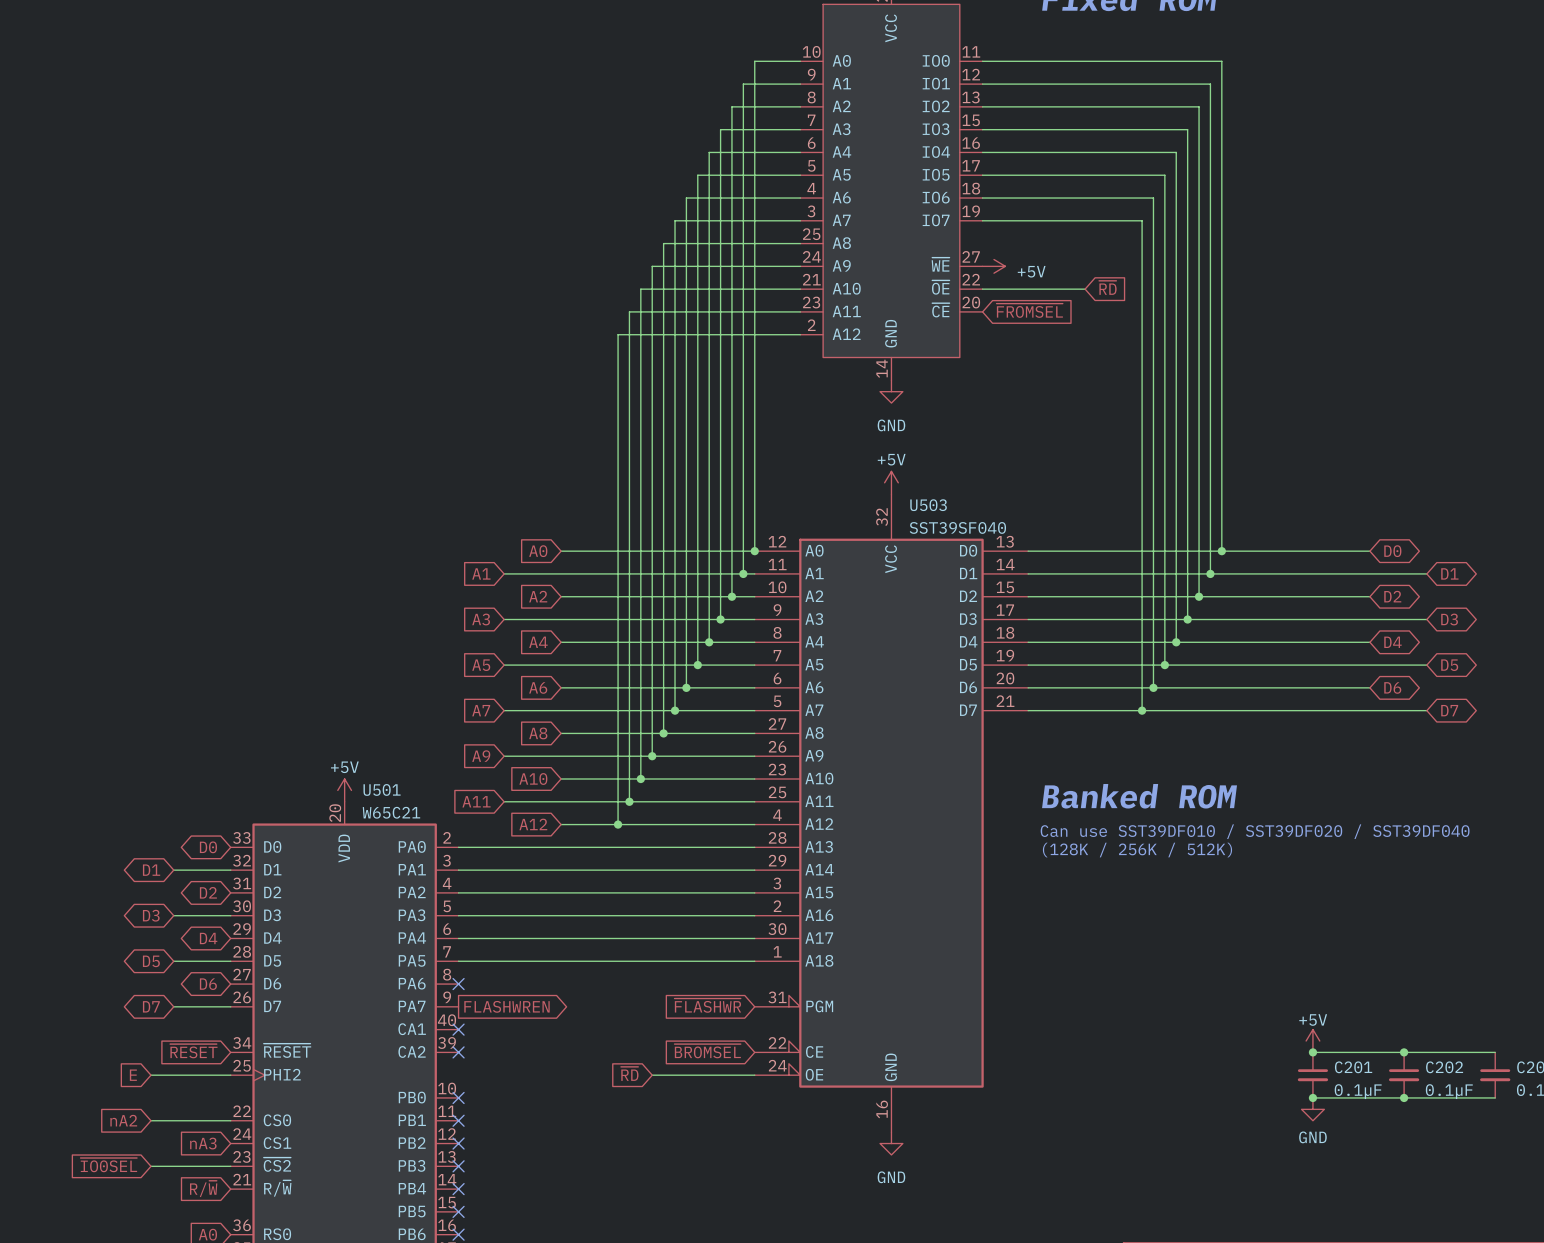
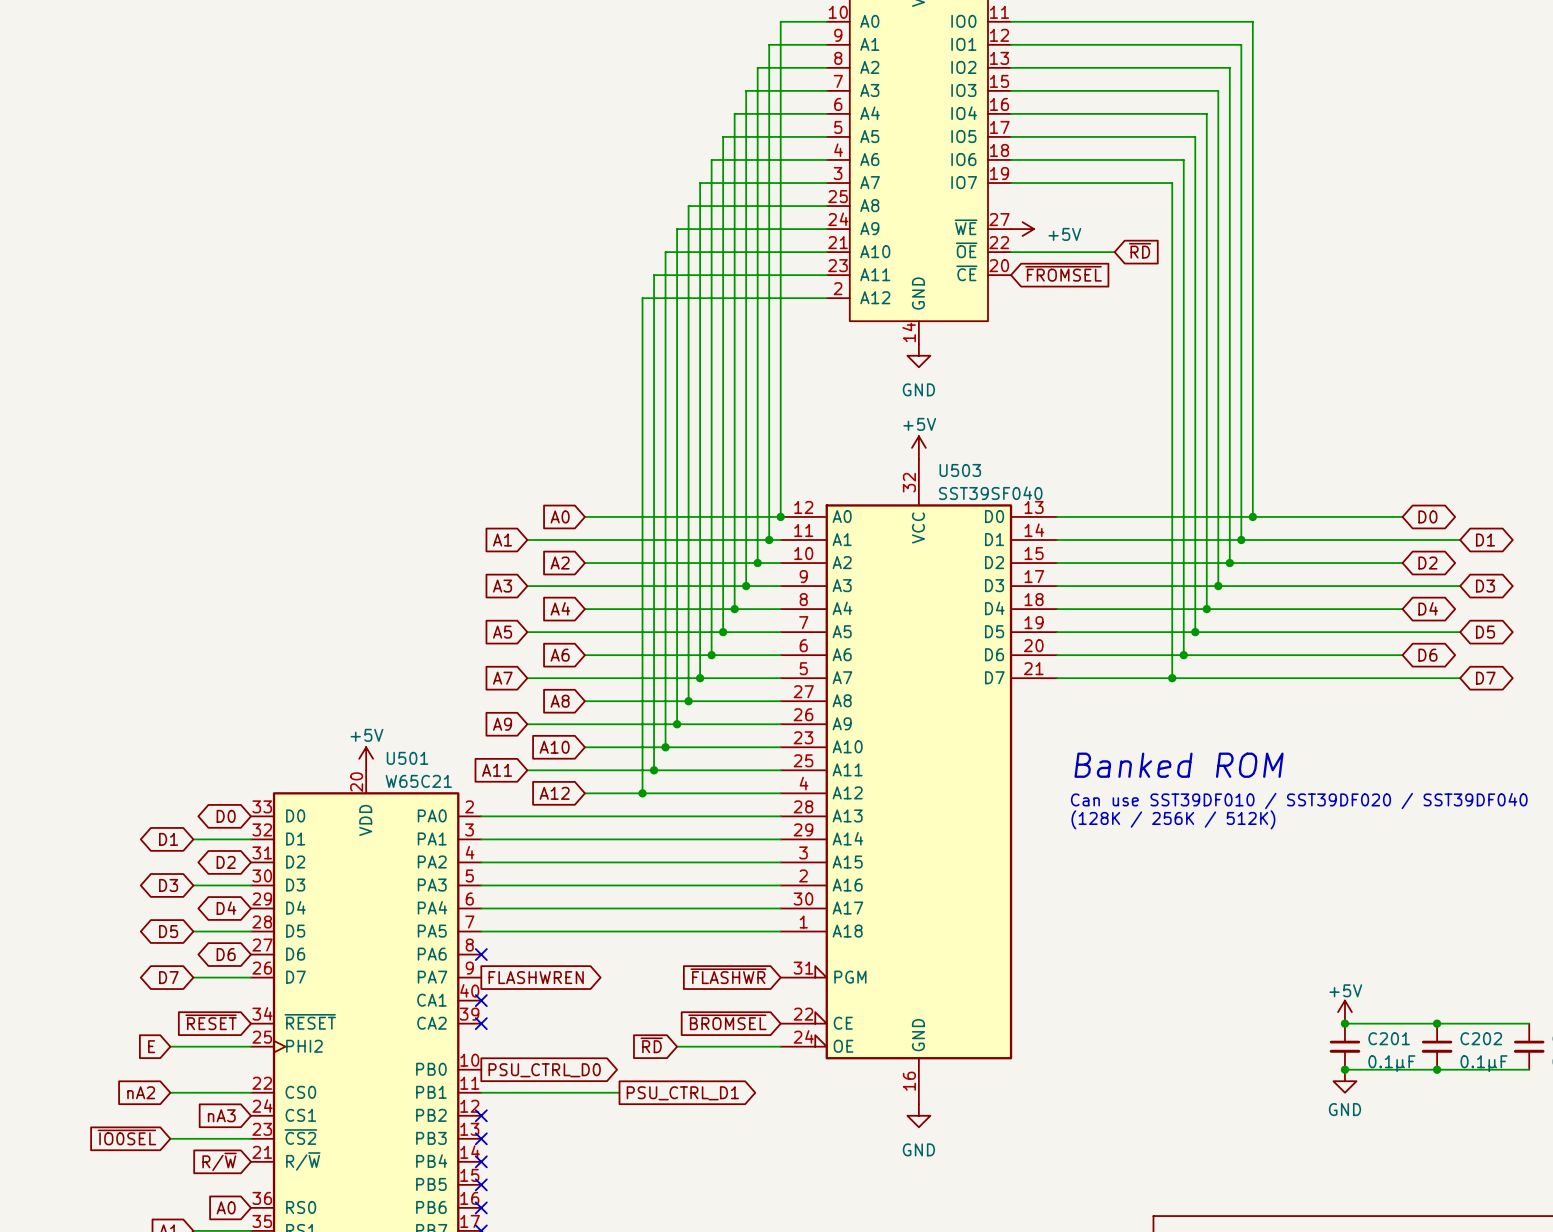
no-connect mark: (458, 1097) -> none
global label: none -> PSU_CTRL_D0 (544, 1070)
wire: none -> (481, 1092) (619, 1092)
no-connect mark: (458, 1120) -> none
global label: none -> PSU_CTRL_D1 (682, 1093)

